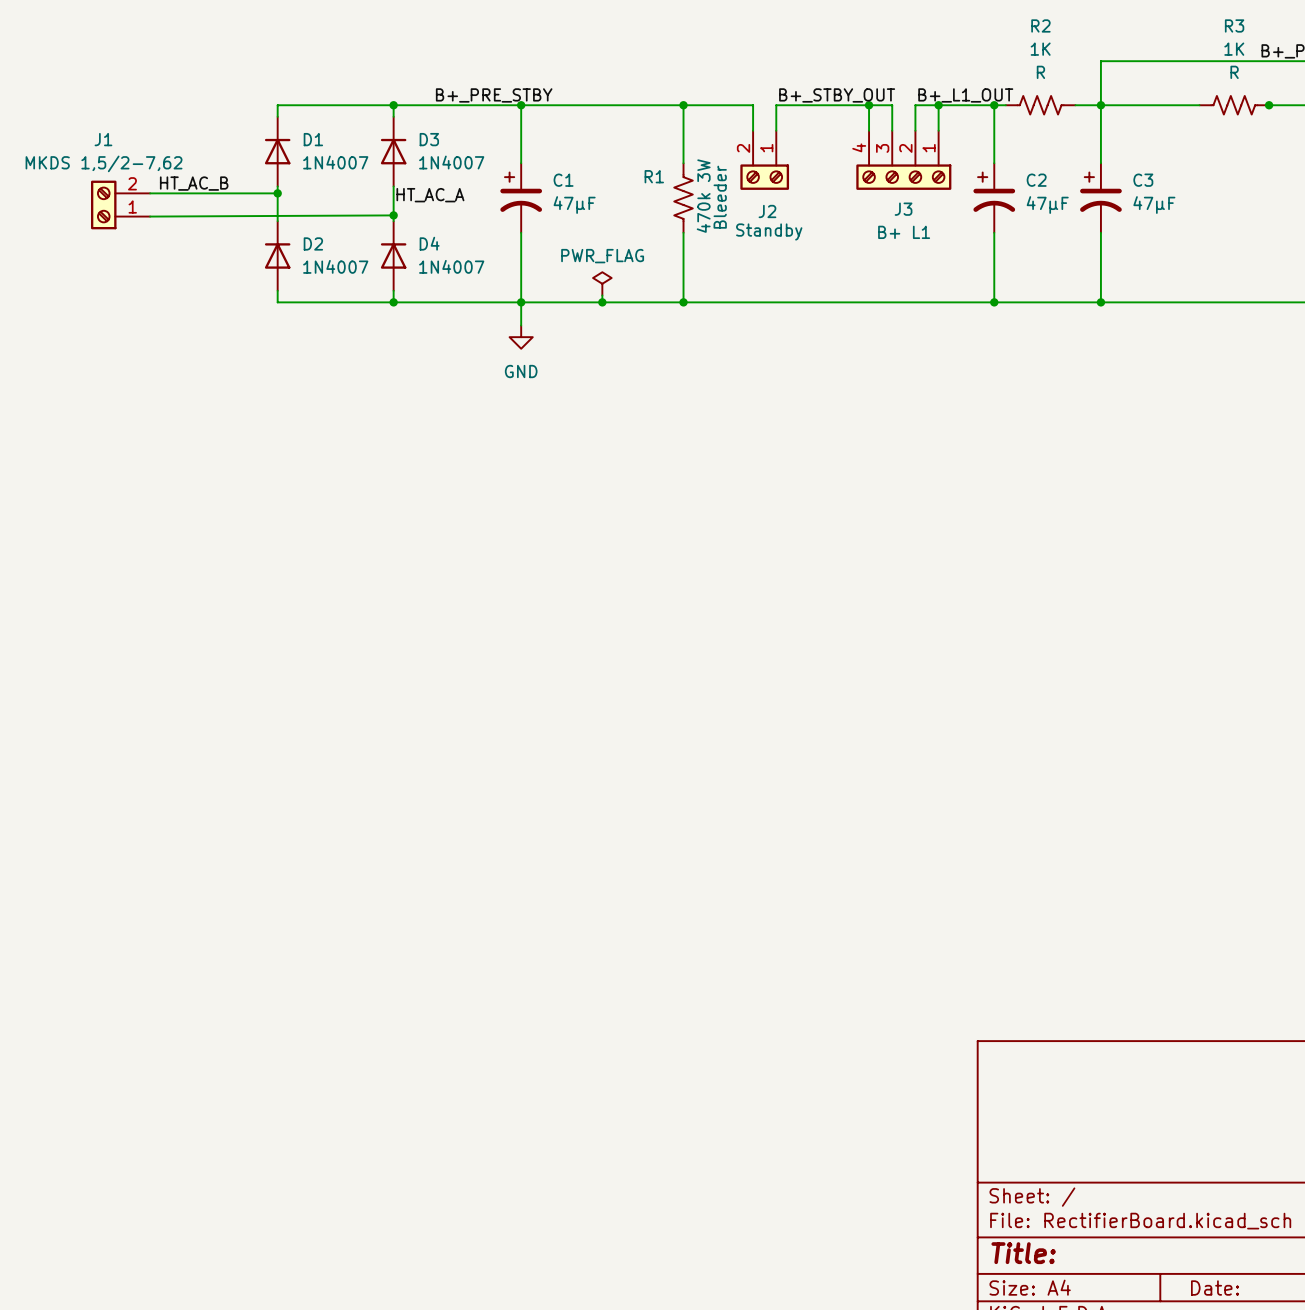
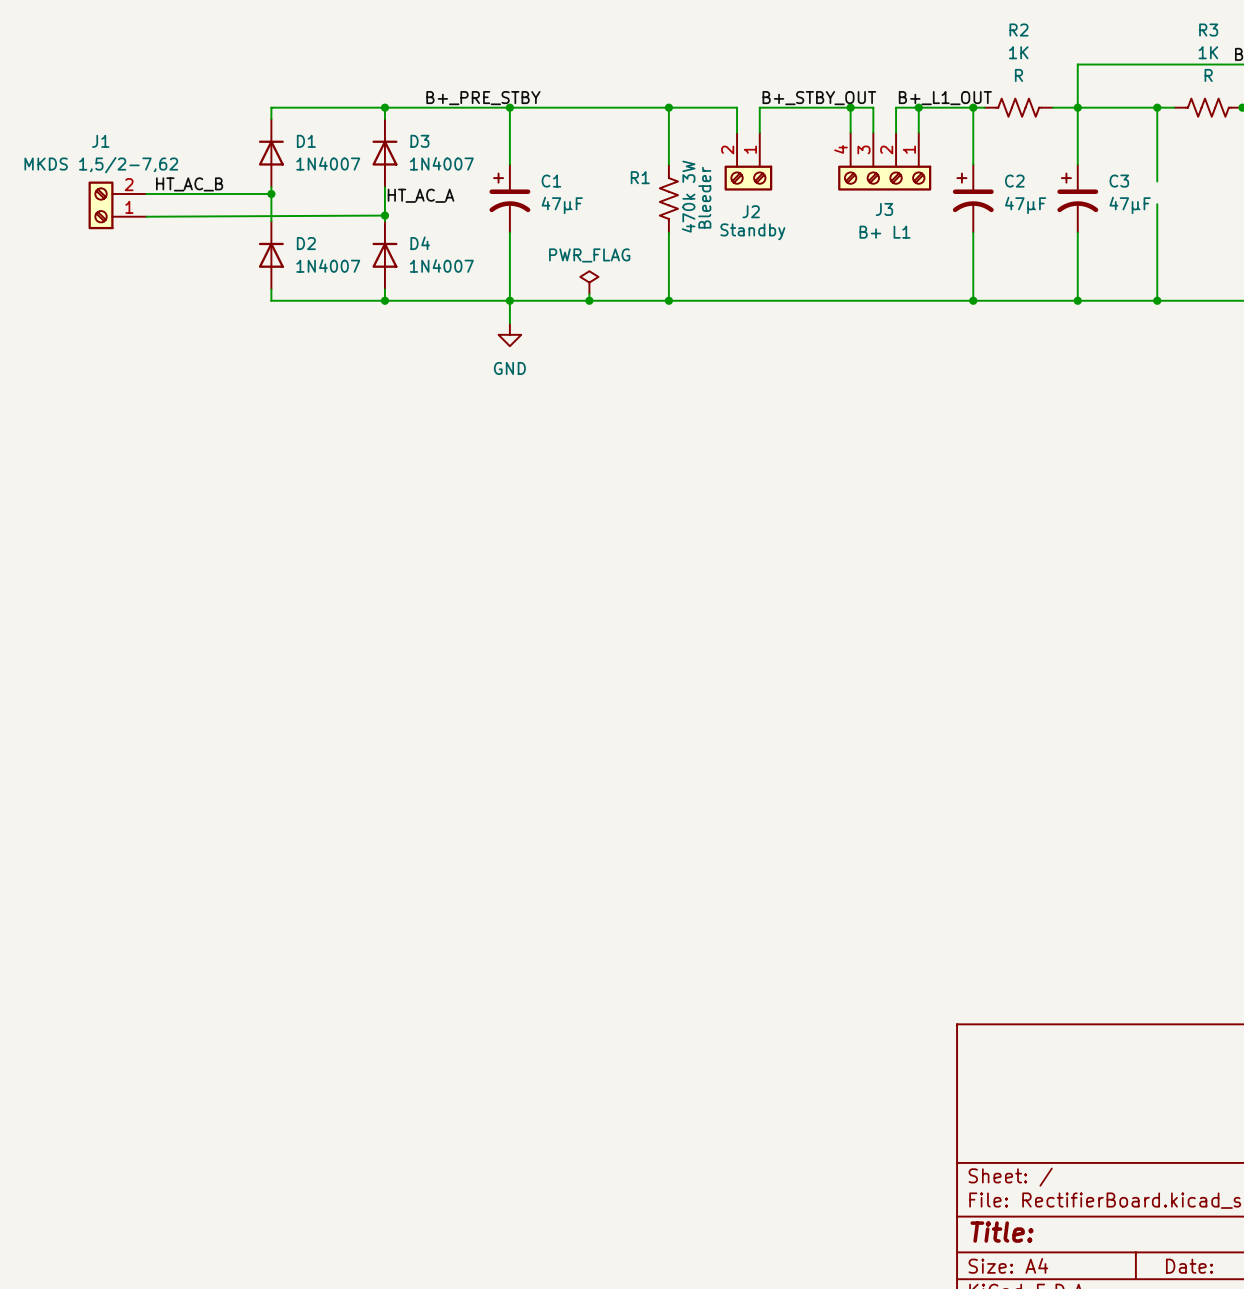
wire: none -> (1157, 107) (1157, 181)
junction: none -> (1157, 107)
wire: none -> (1157, 204) (1157, 300)
junction: none -> (1157, 300)

